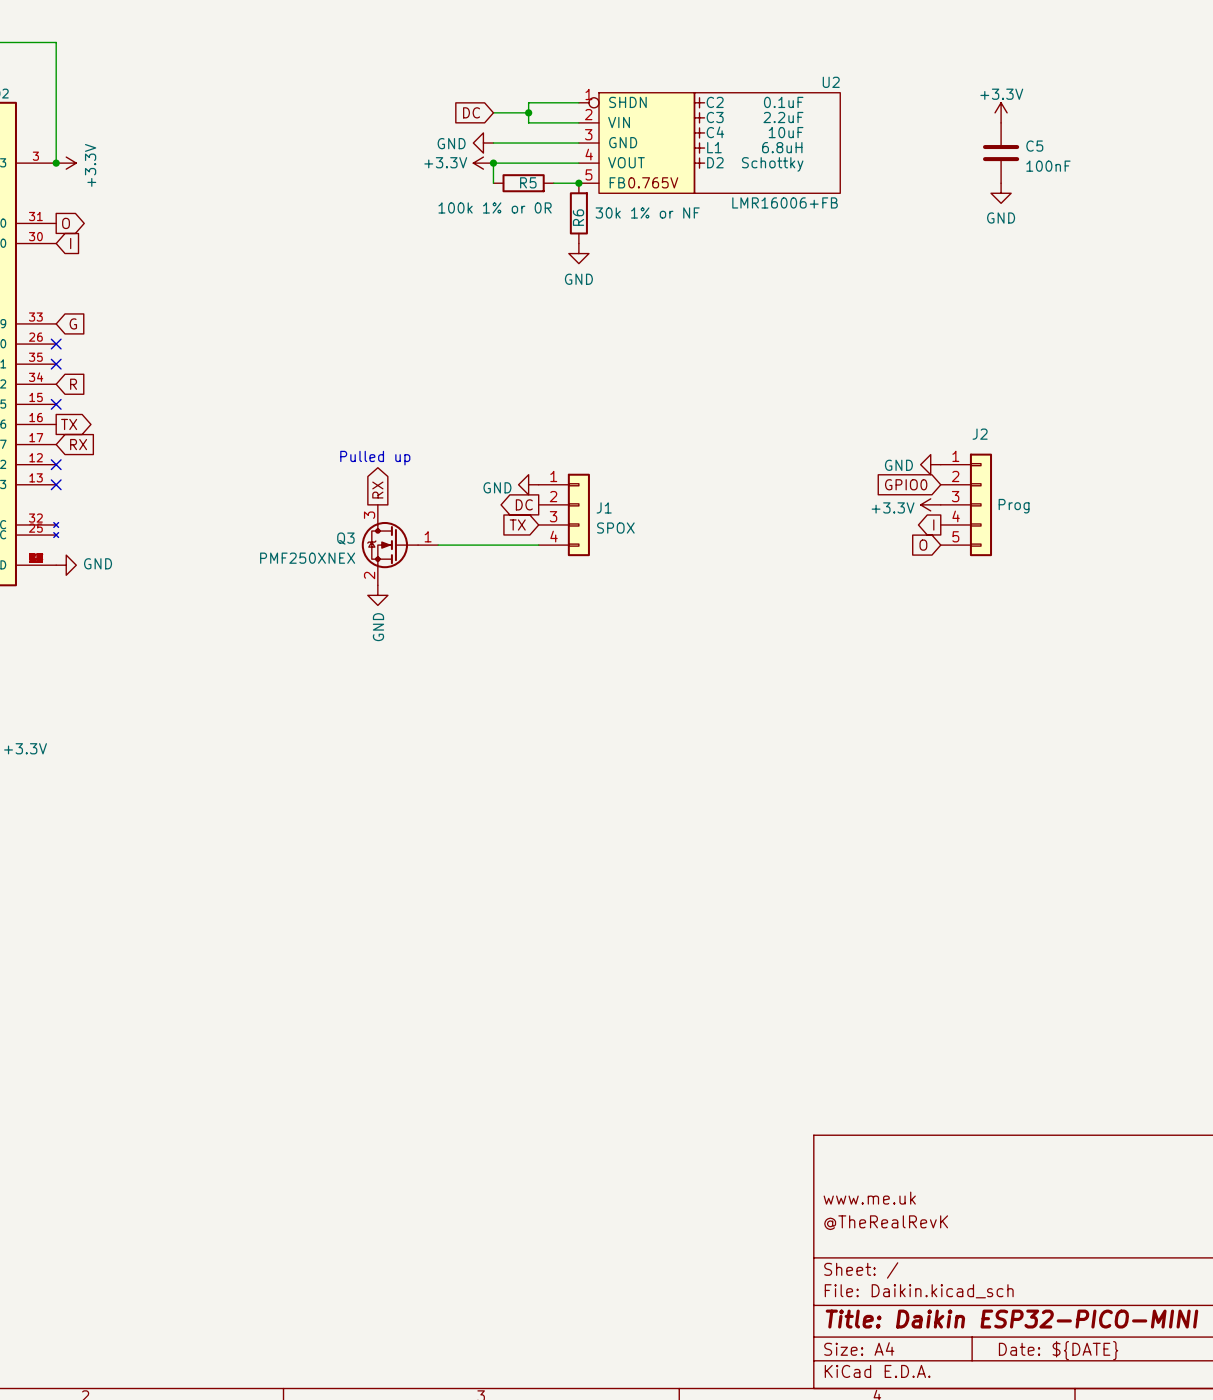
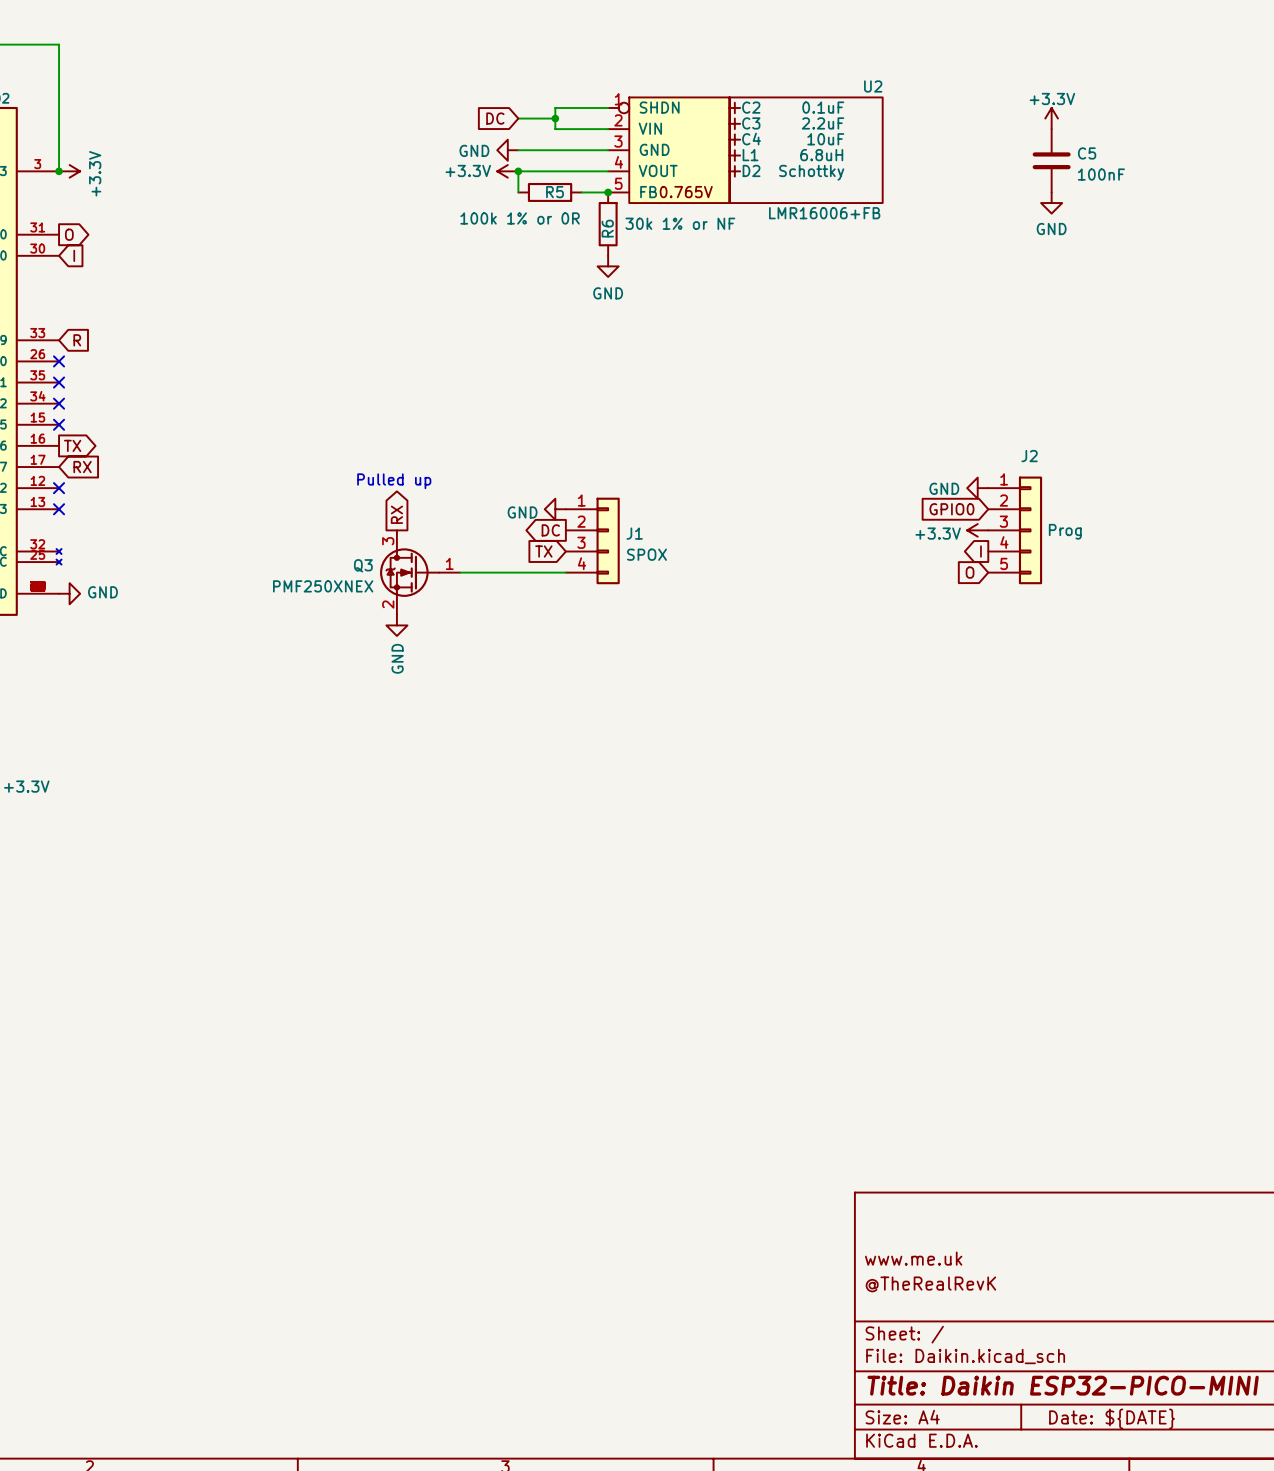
global label: G (73, 323) -> R (77, 340)
no-connect mark: none -> (59, 403)
global label: R (73, 384) -> none

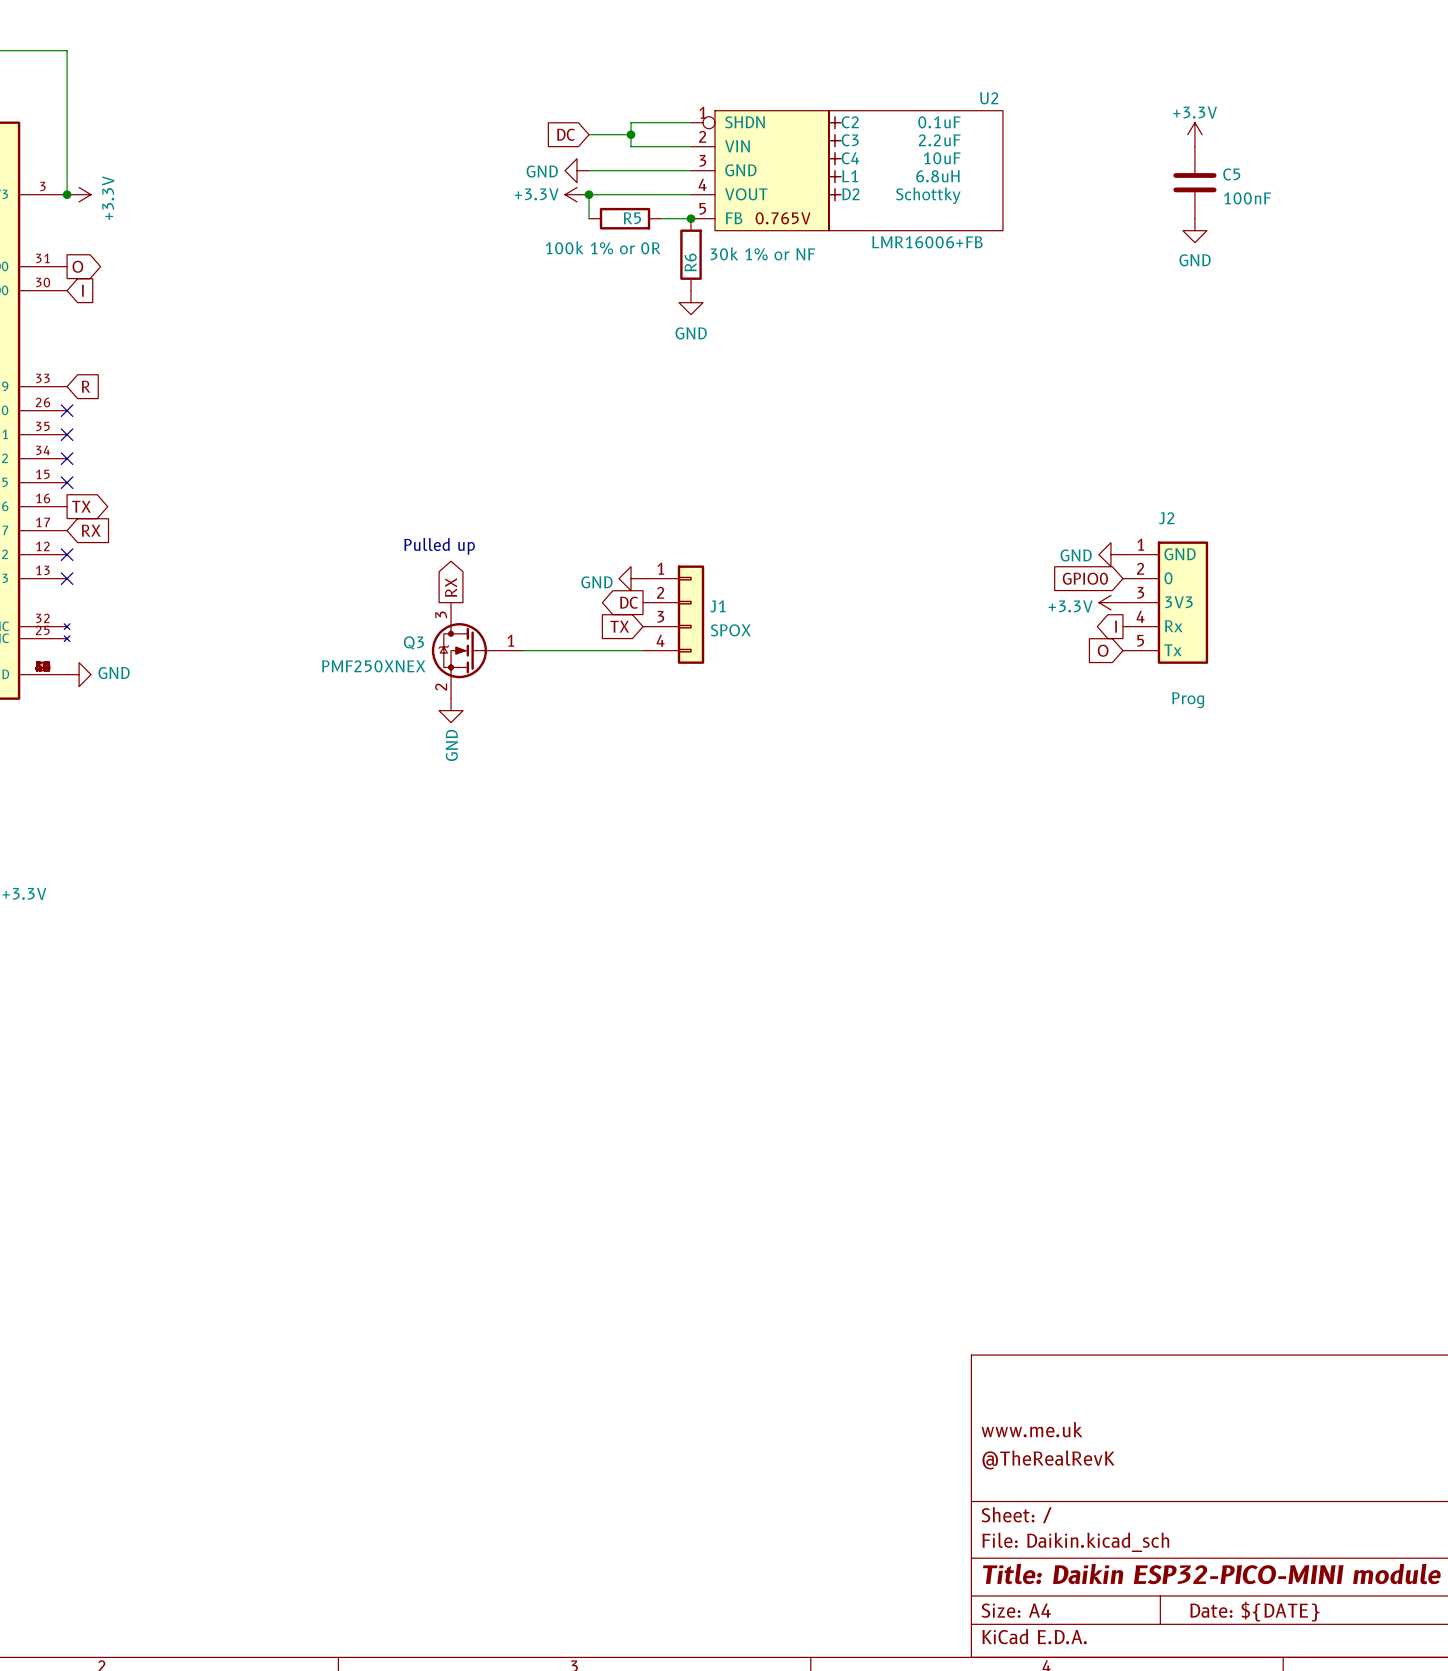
J2 symbol: [988, 476, 1043, 585] -> [1122, 541, 1209, 664]
J2 value position: Prog (1065, 531) -> Prog (1188, 700)

